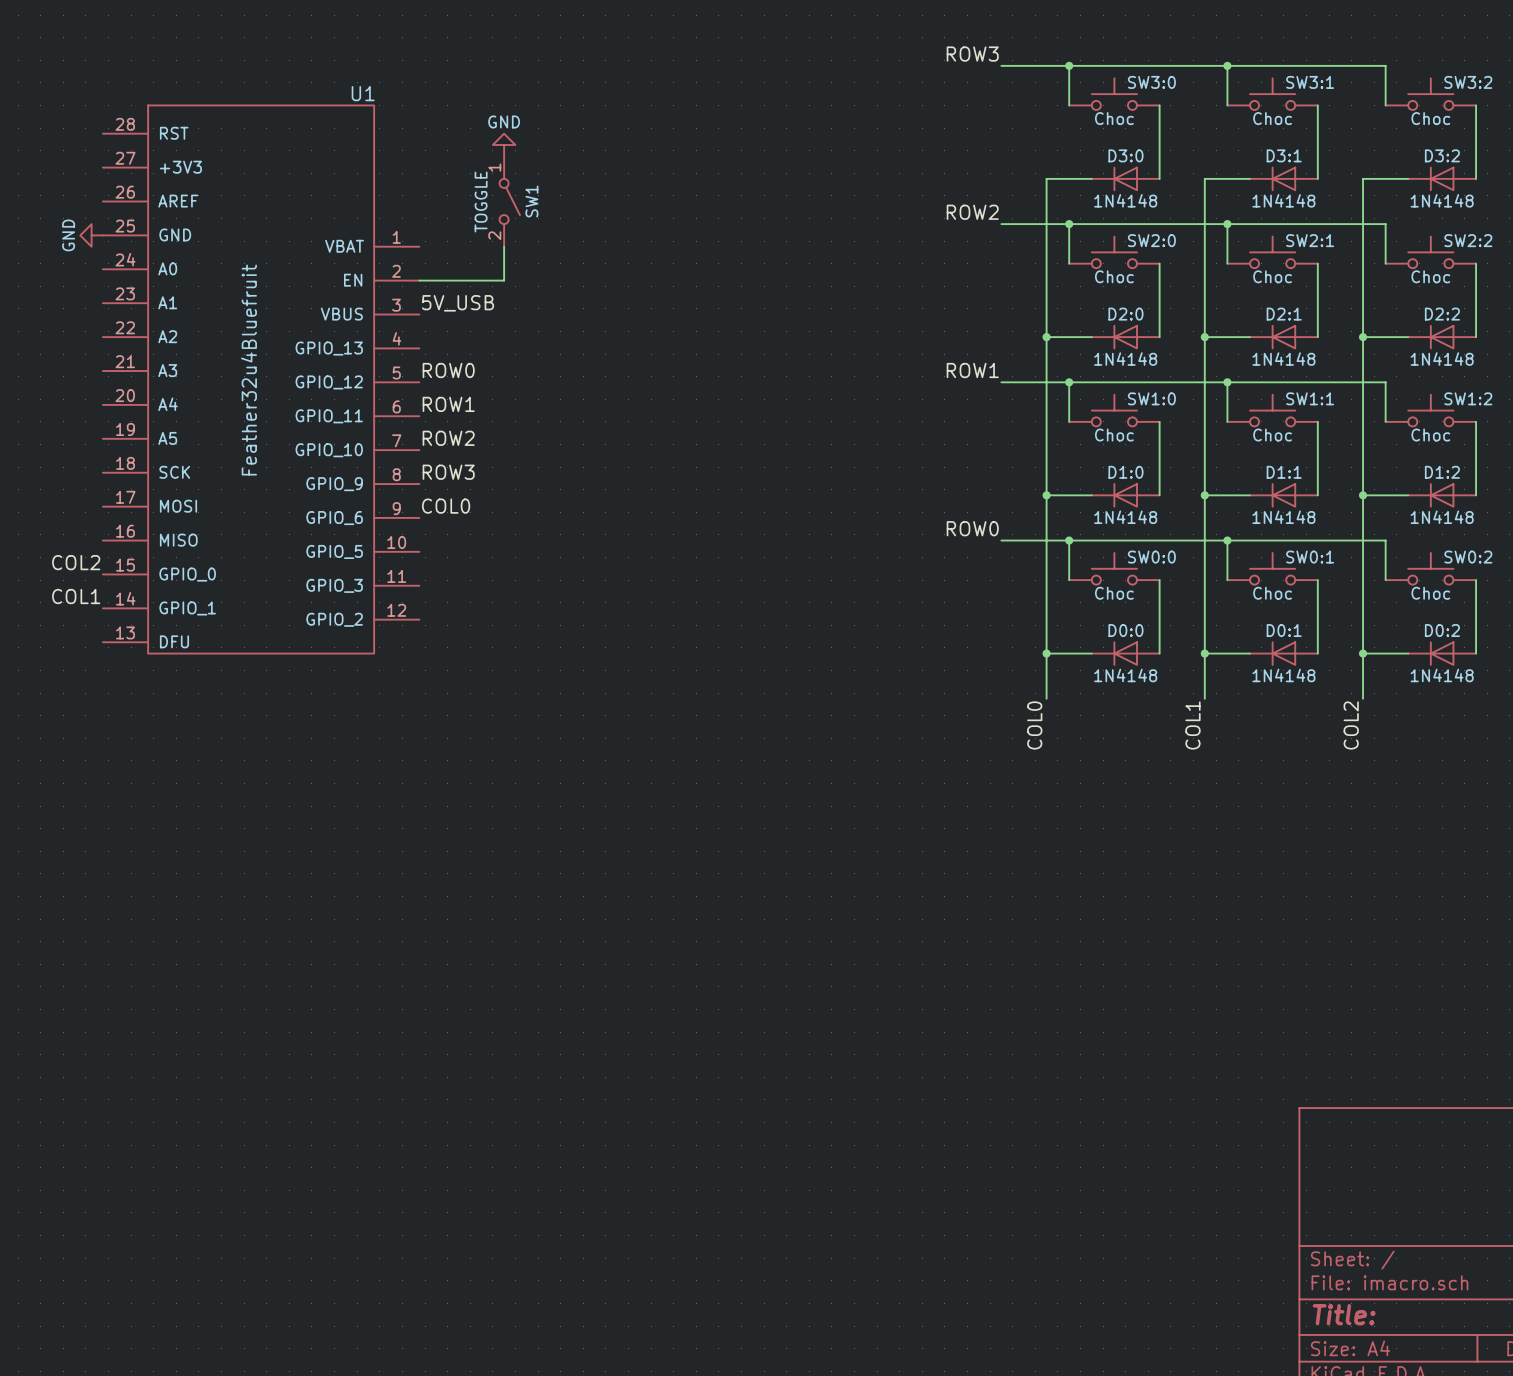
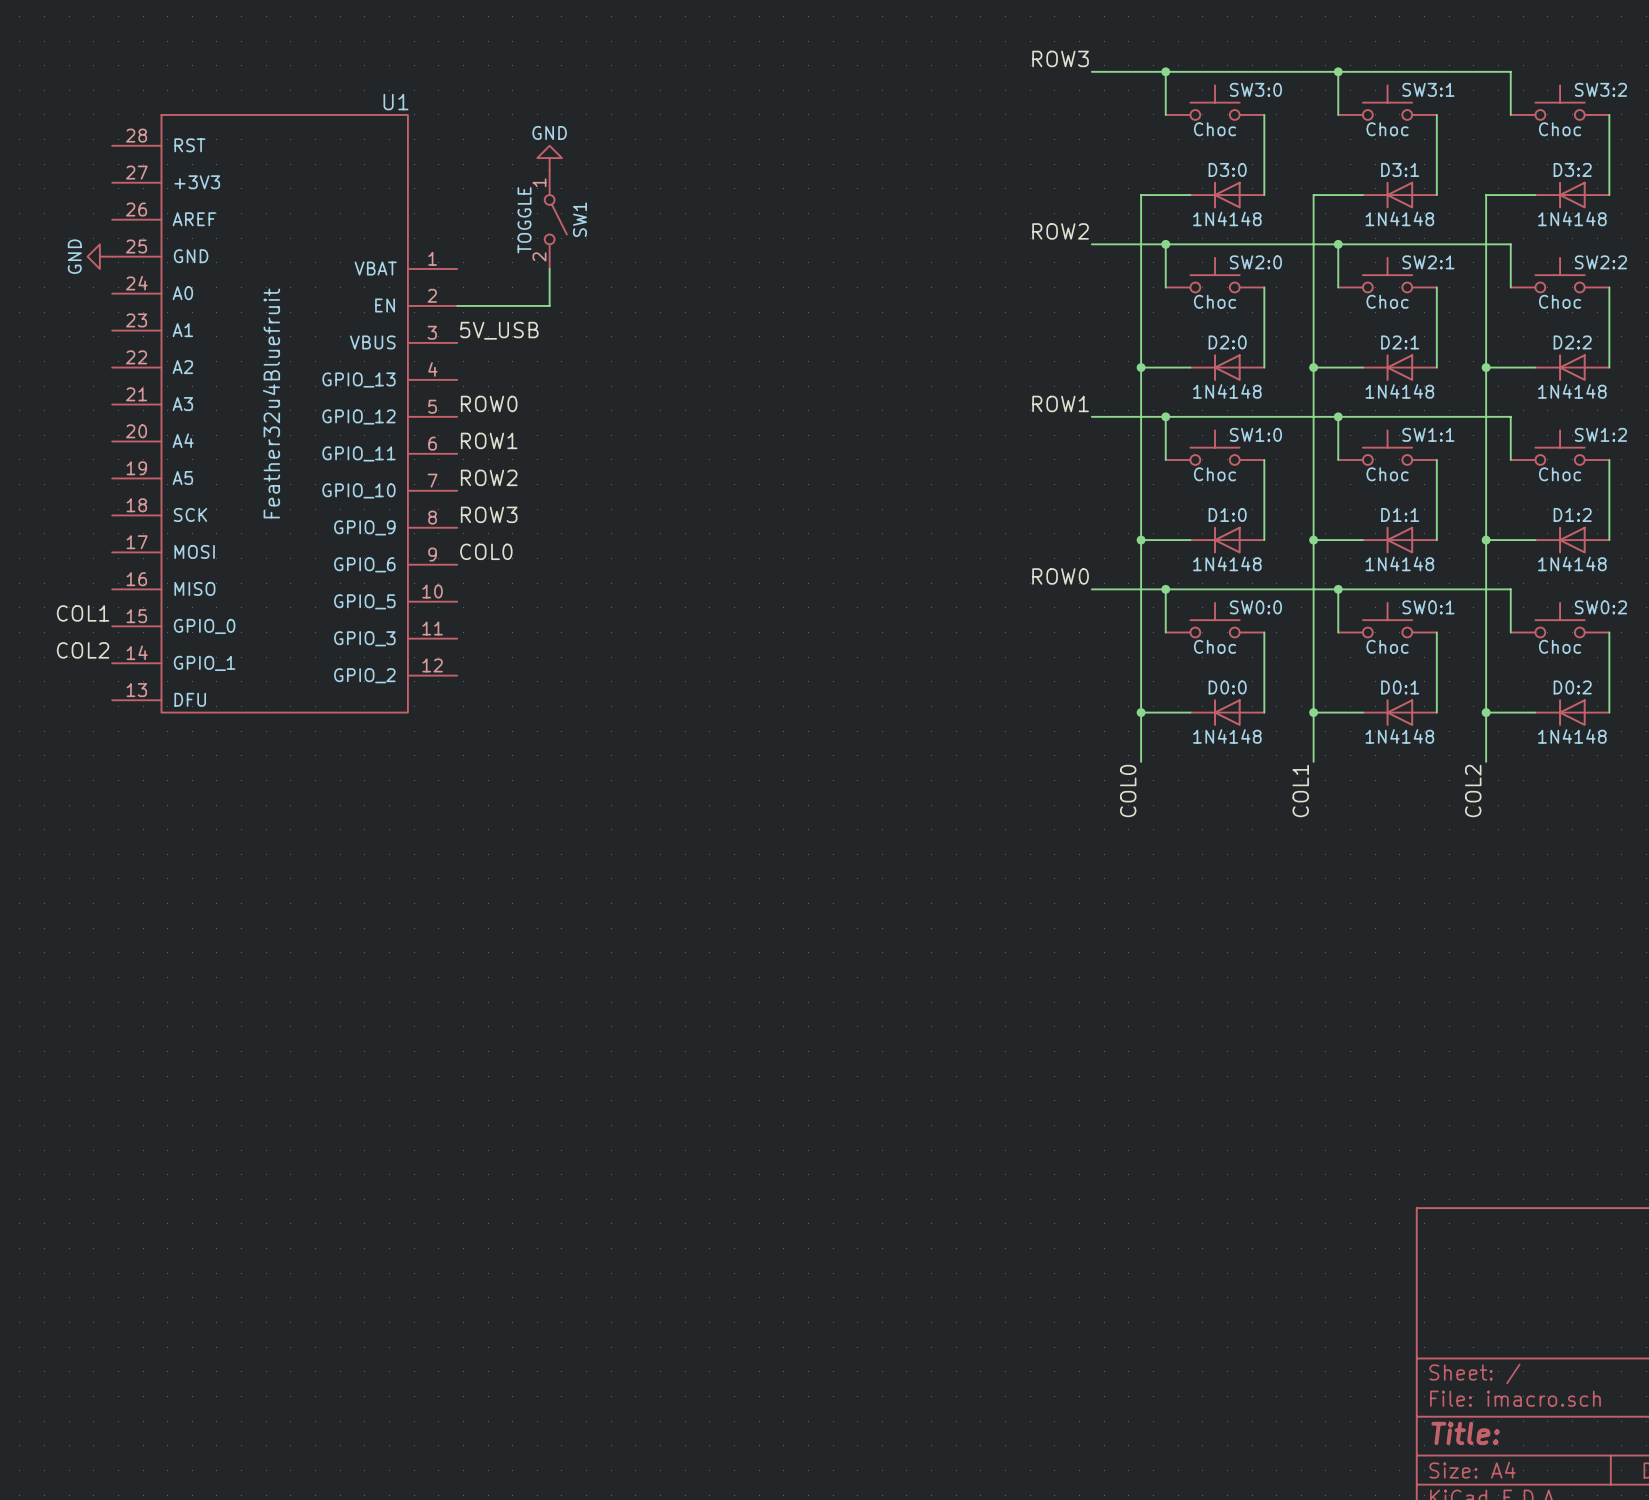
label: COL2 (76, 562) -> COL1 (83, 613)
label: COL1 (76, 596) -> COL2 (83, 650)

